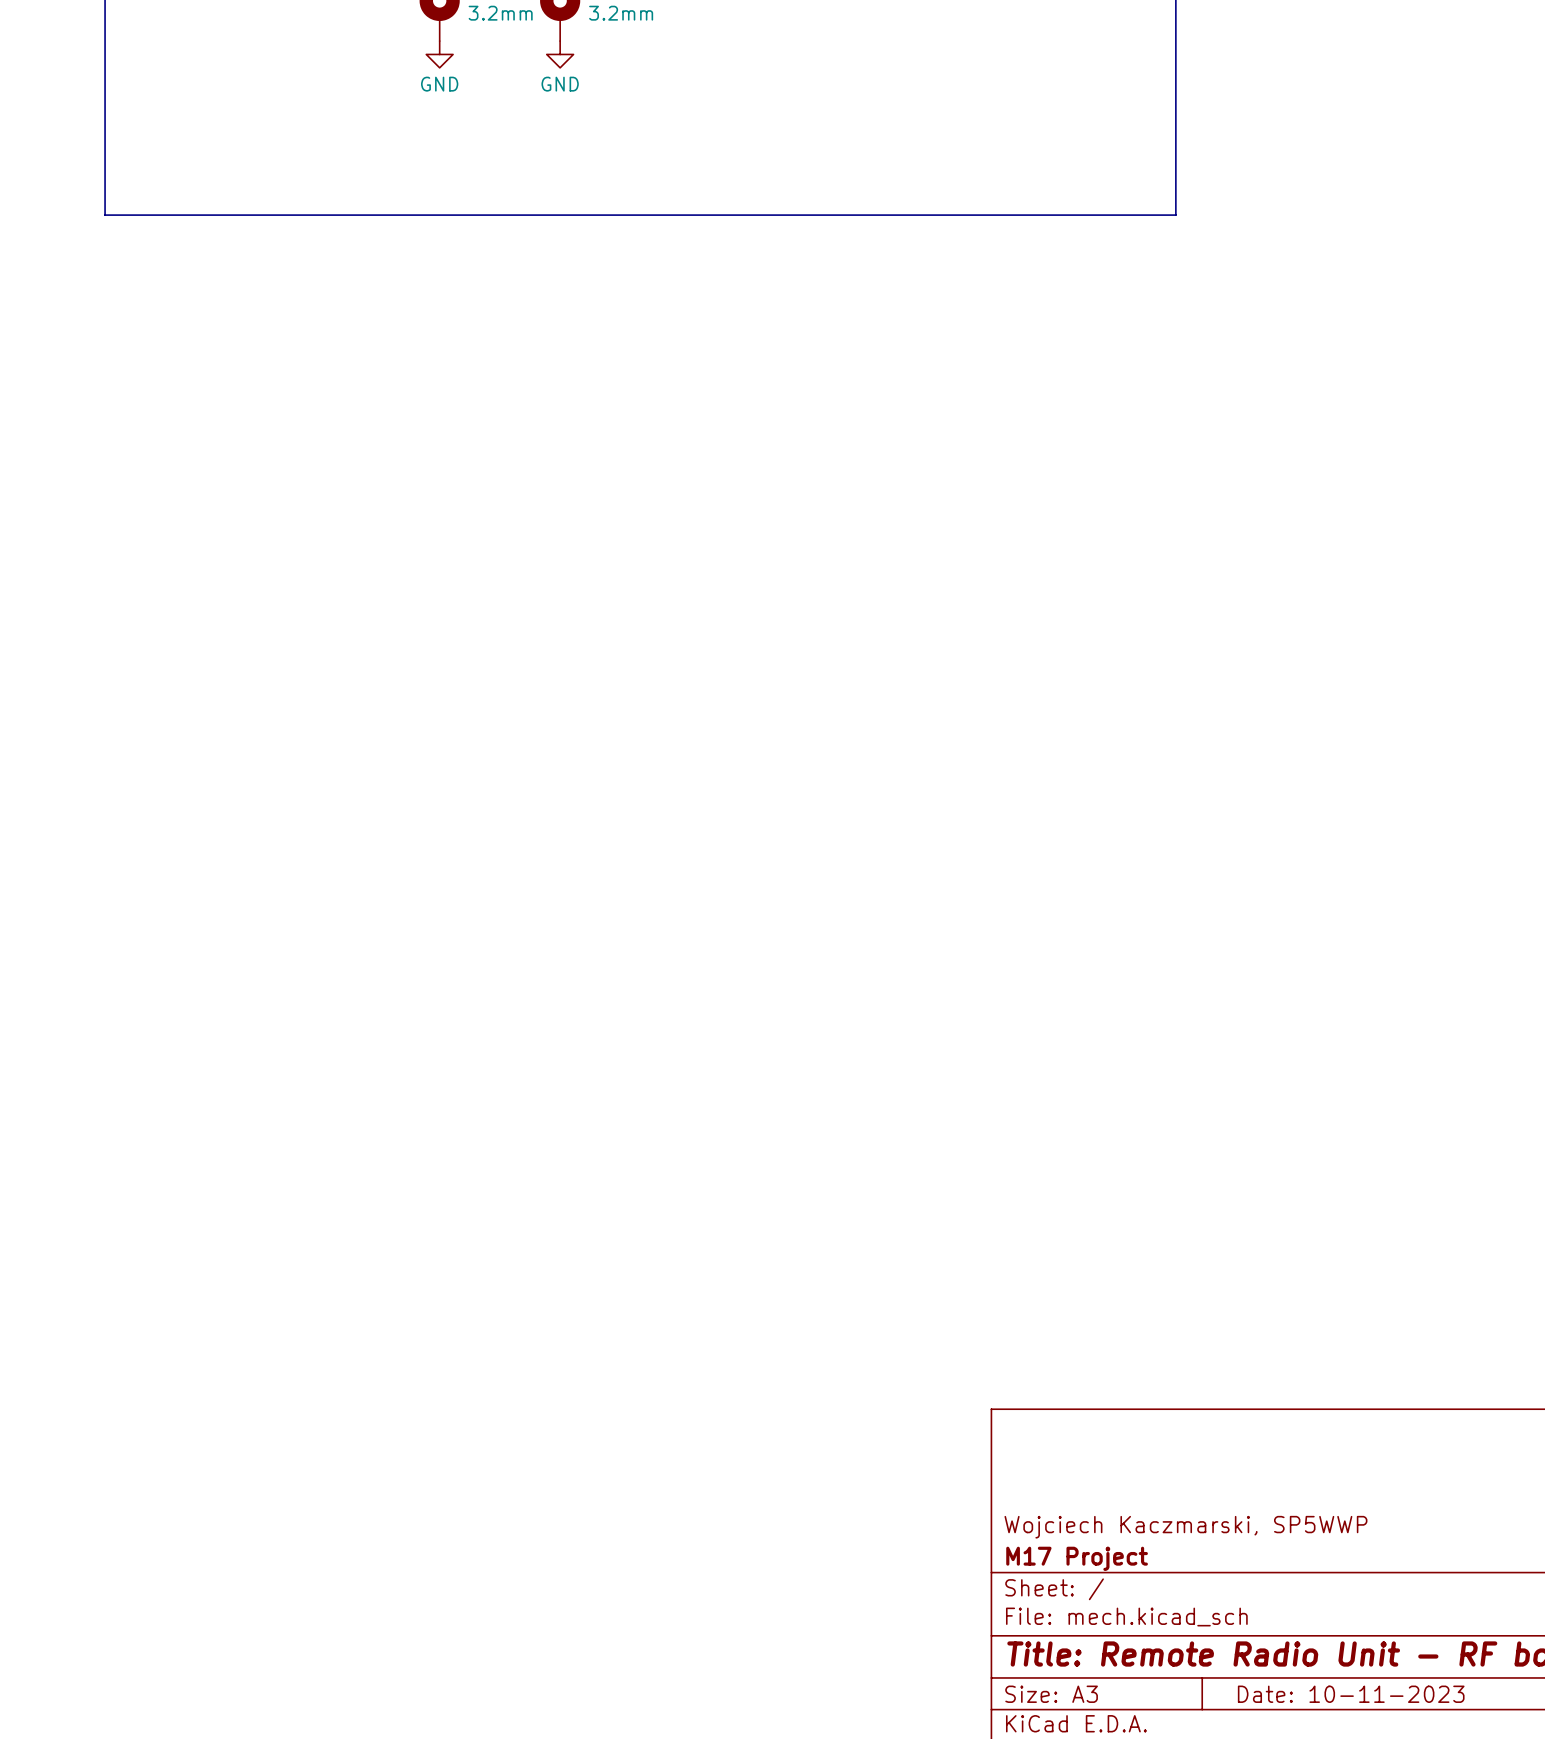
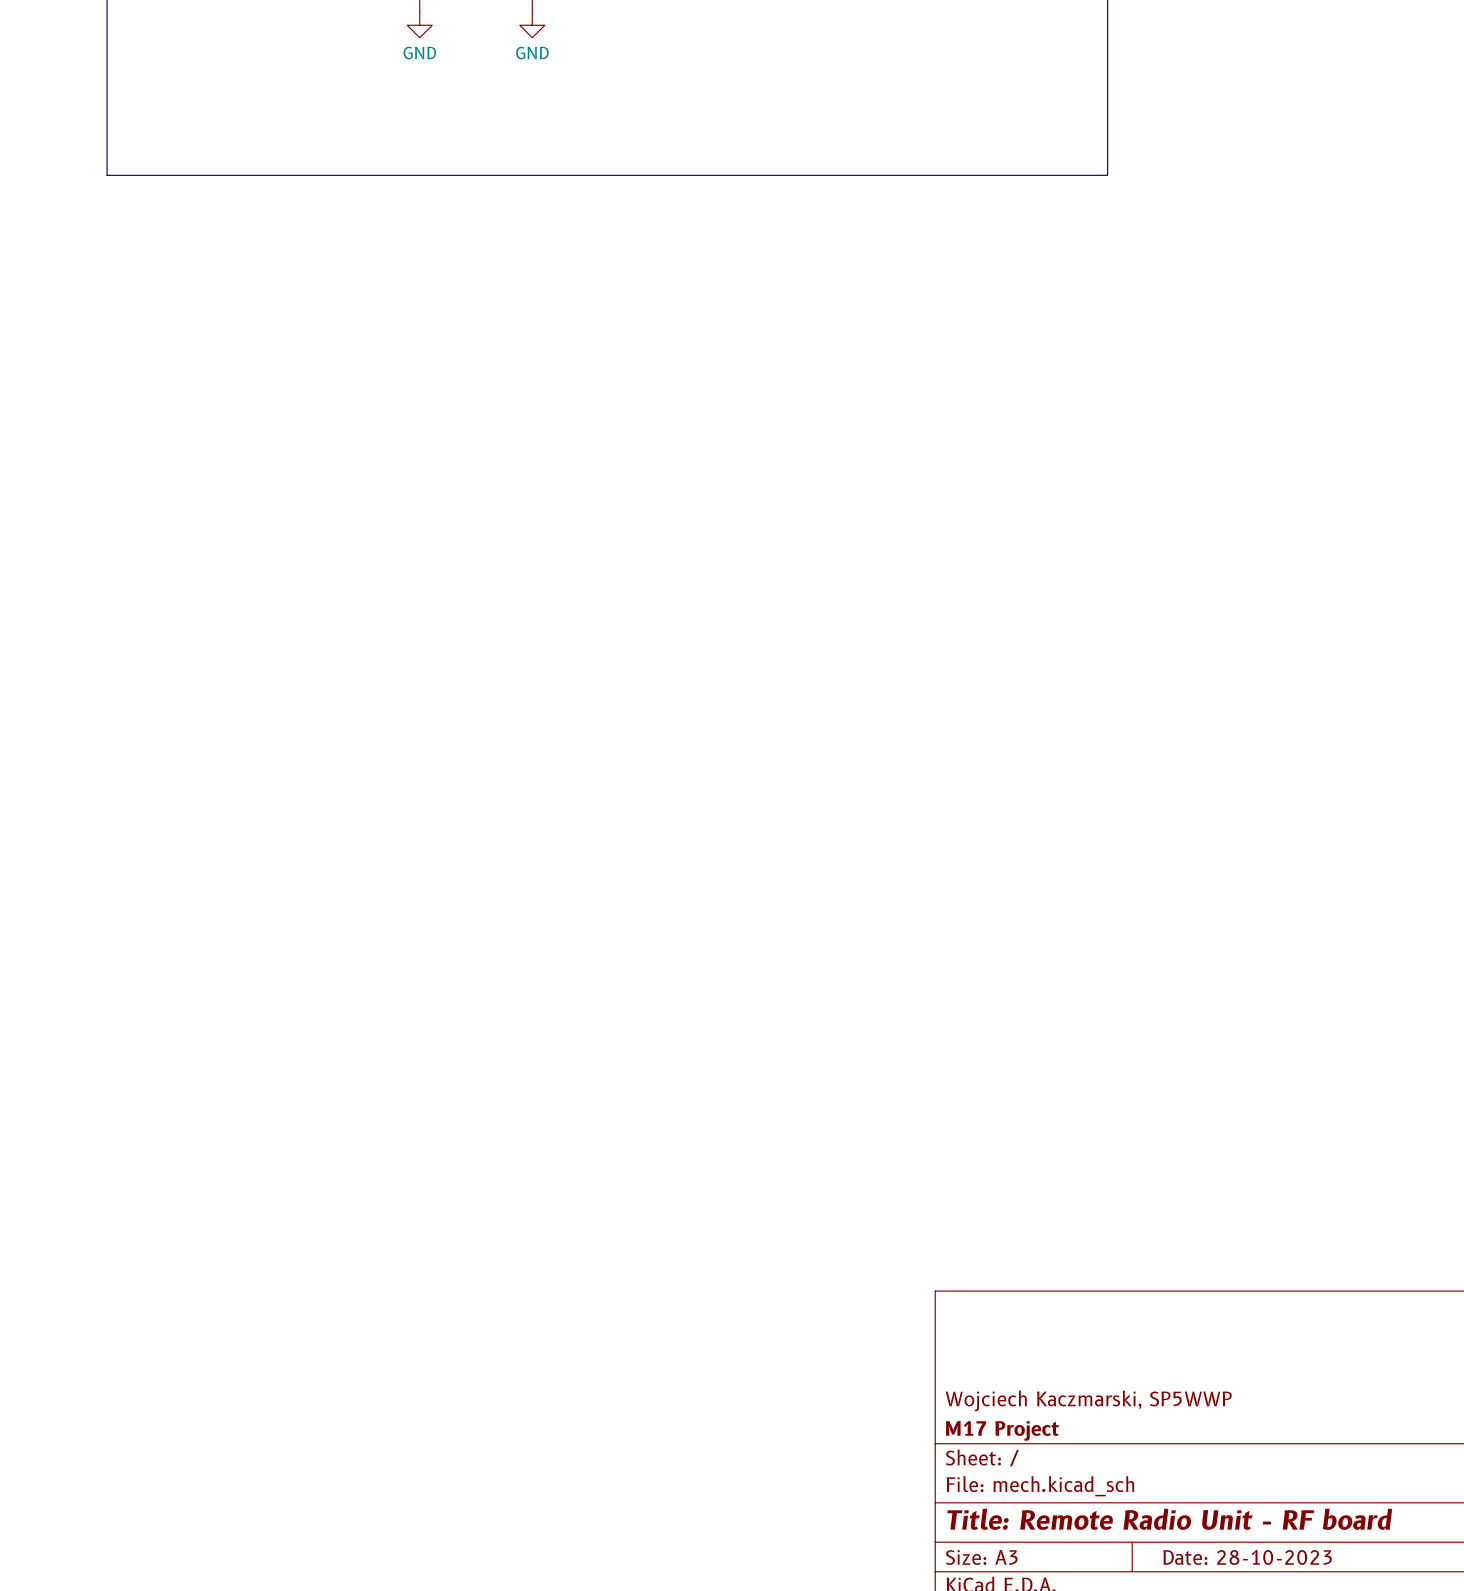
title block: Date: 10-11-2023 (1351, 1694) -> Date: 28-10-2023 (1247, 1557)

